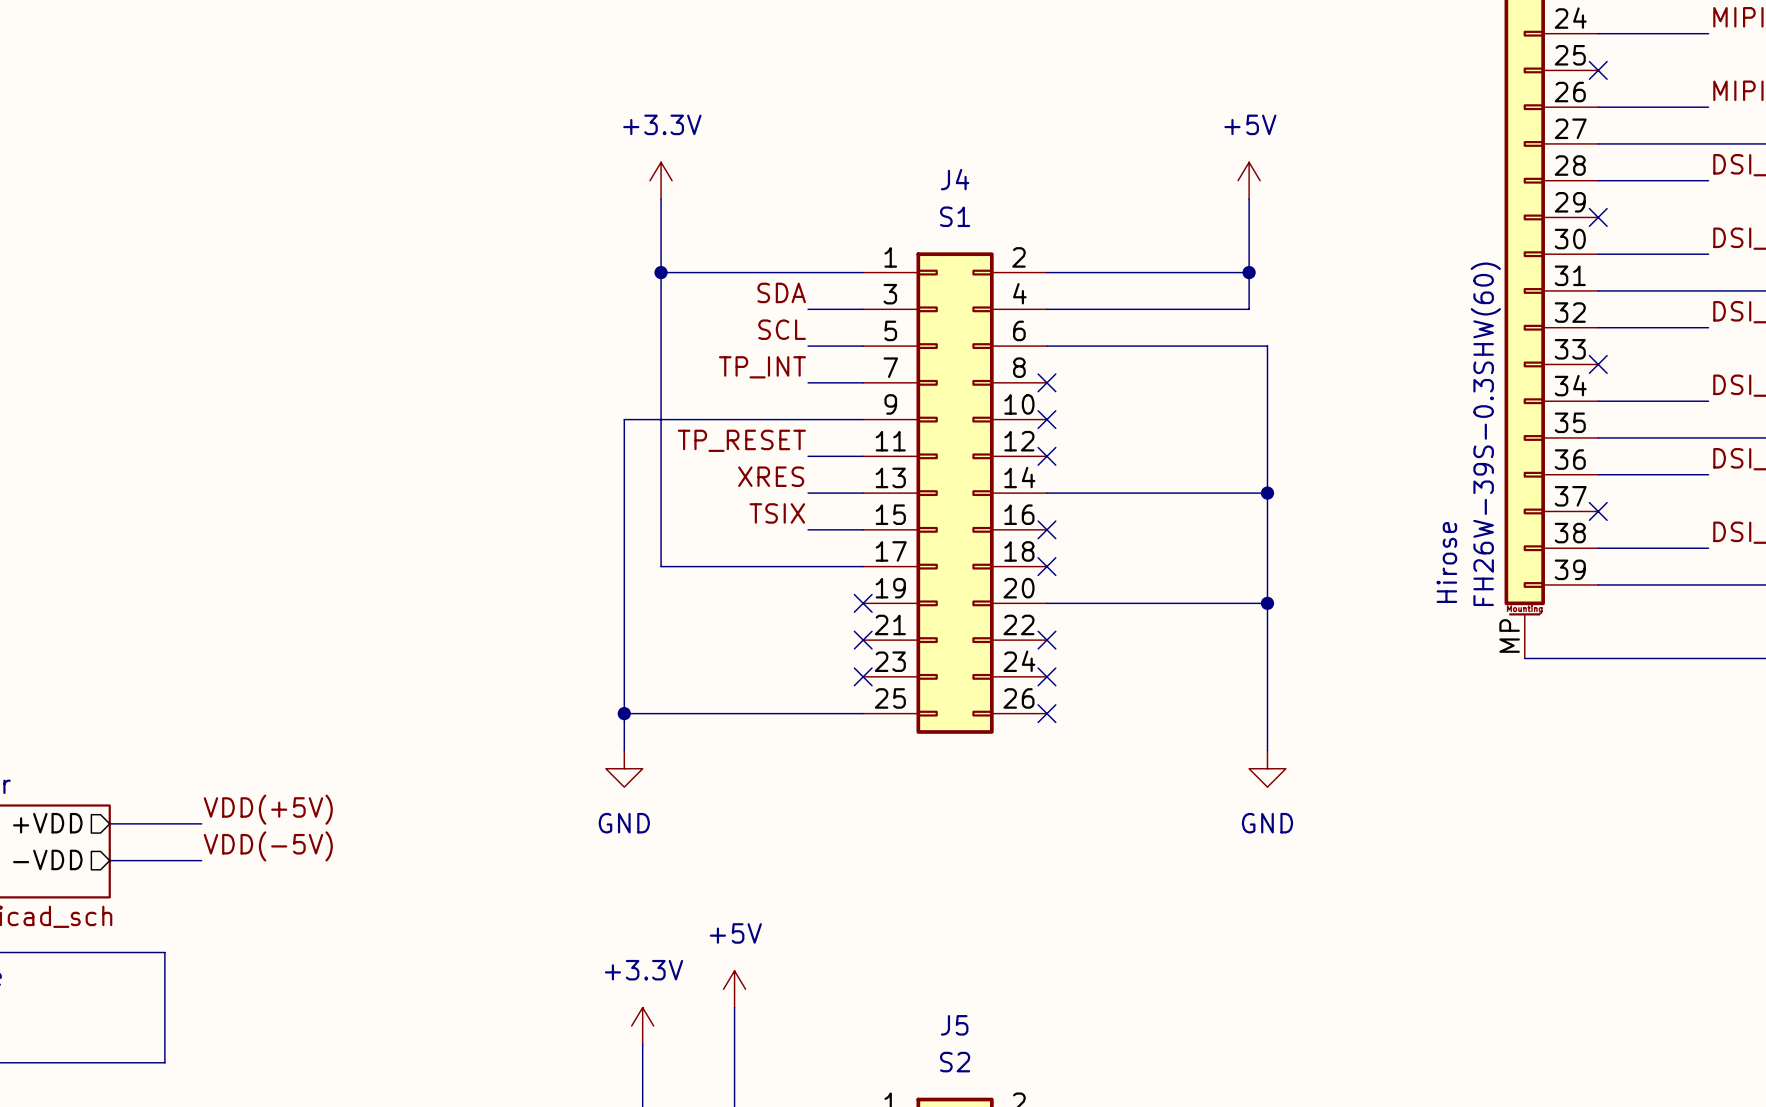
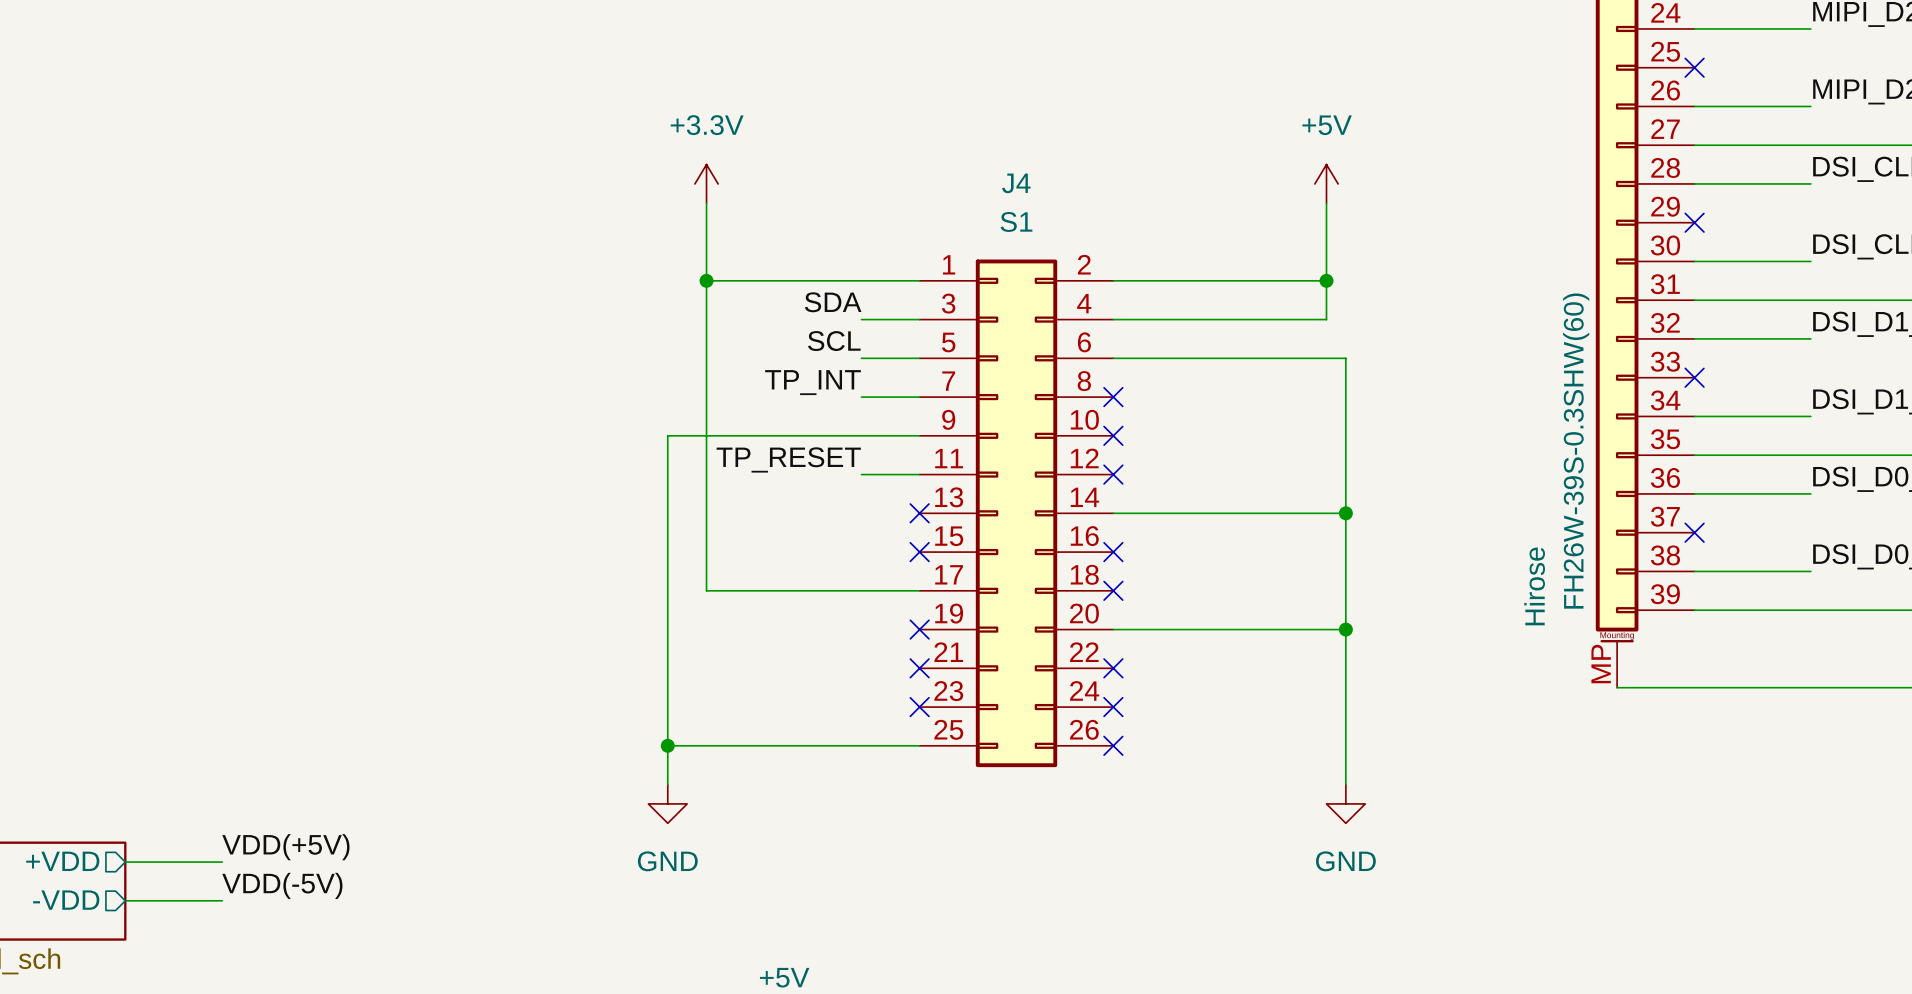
label: XRES (771, 476) -> none
wire: (808, 493) (863, 493) -> none
no-connect mark: none -> (919, 513)
label: TSIX (777, 513) -> none
wire: (808, 529) (863, 529) -> none
no-connect mark: none -> (919, 552)

